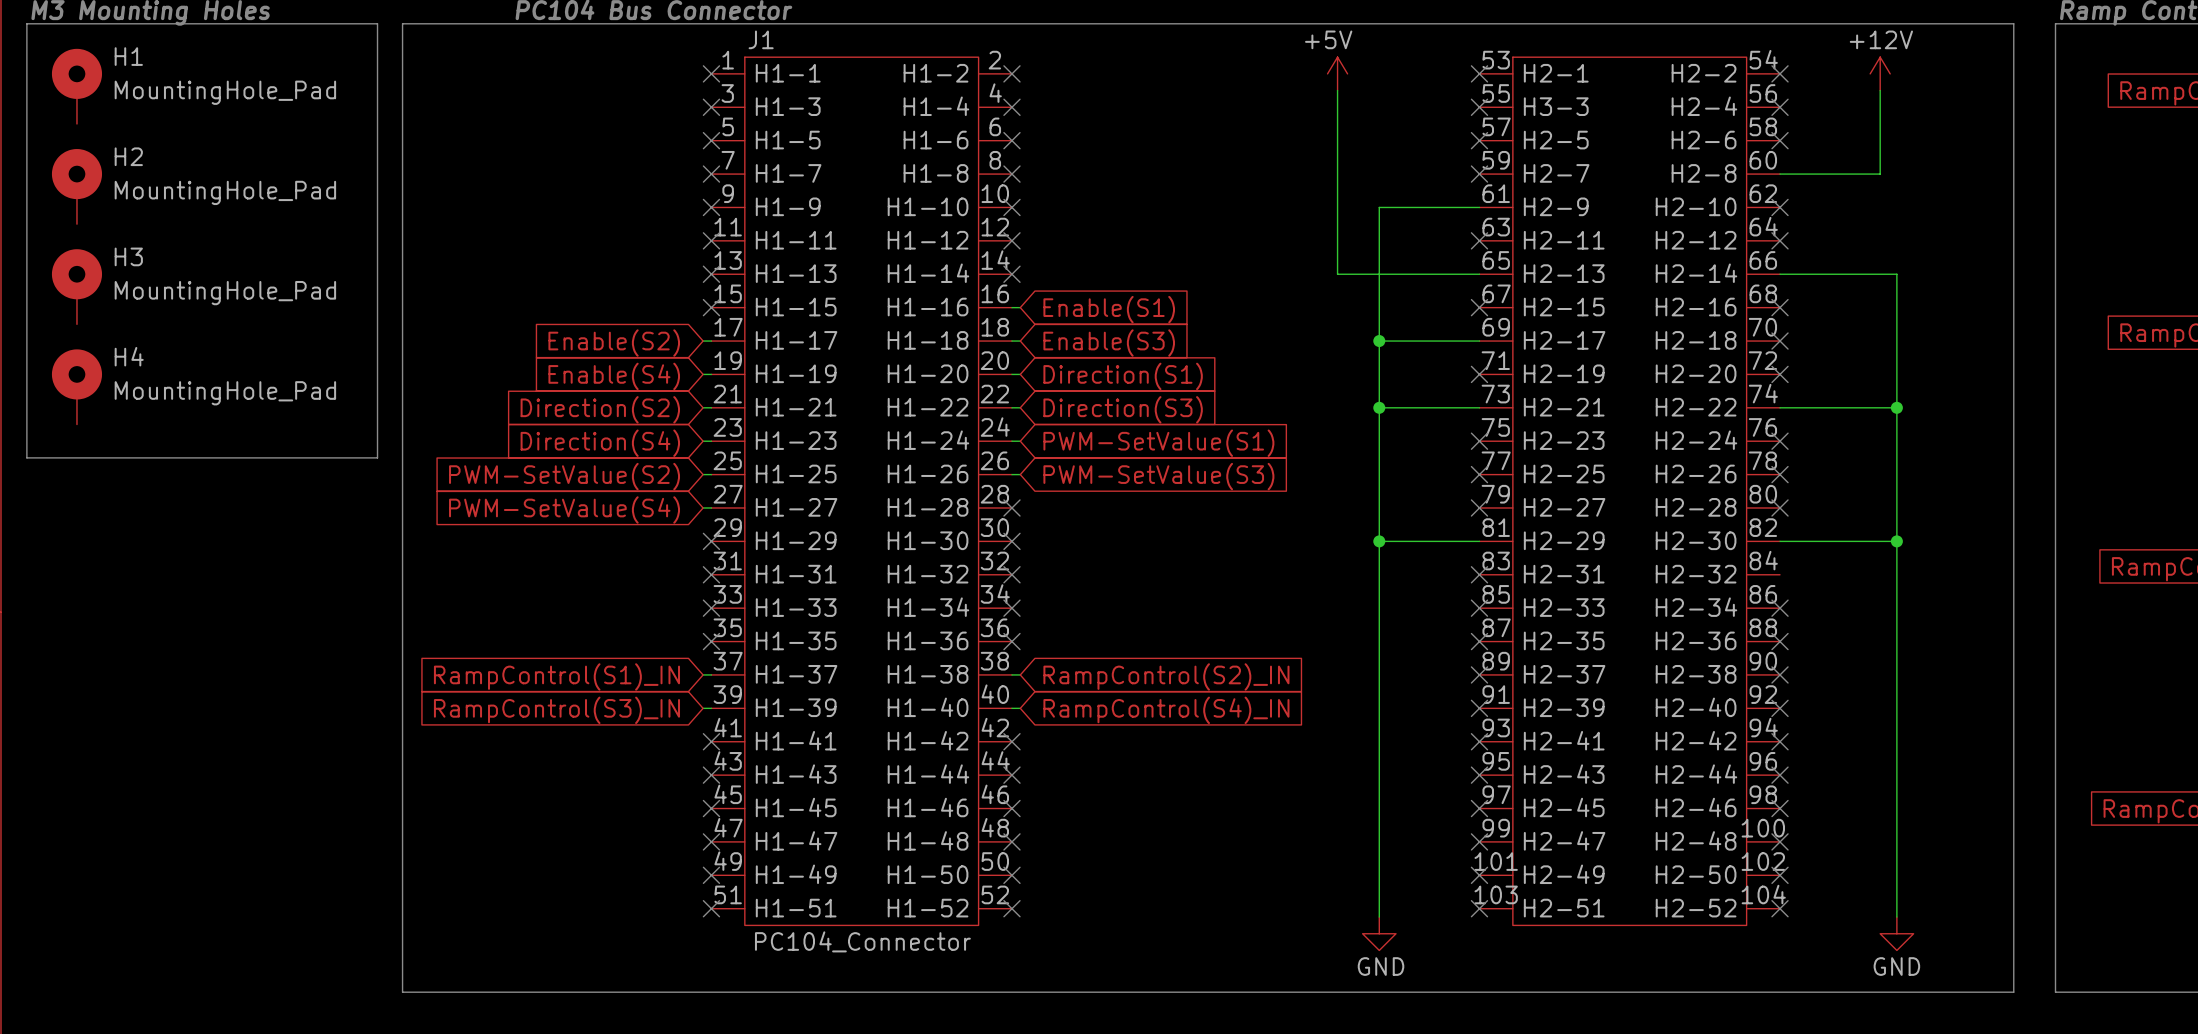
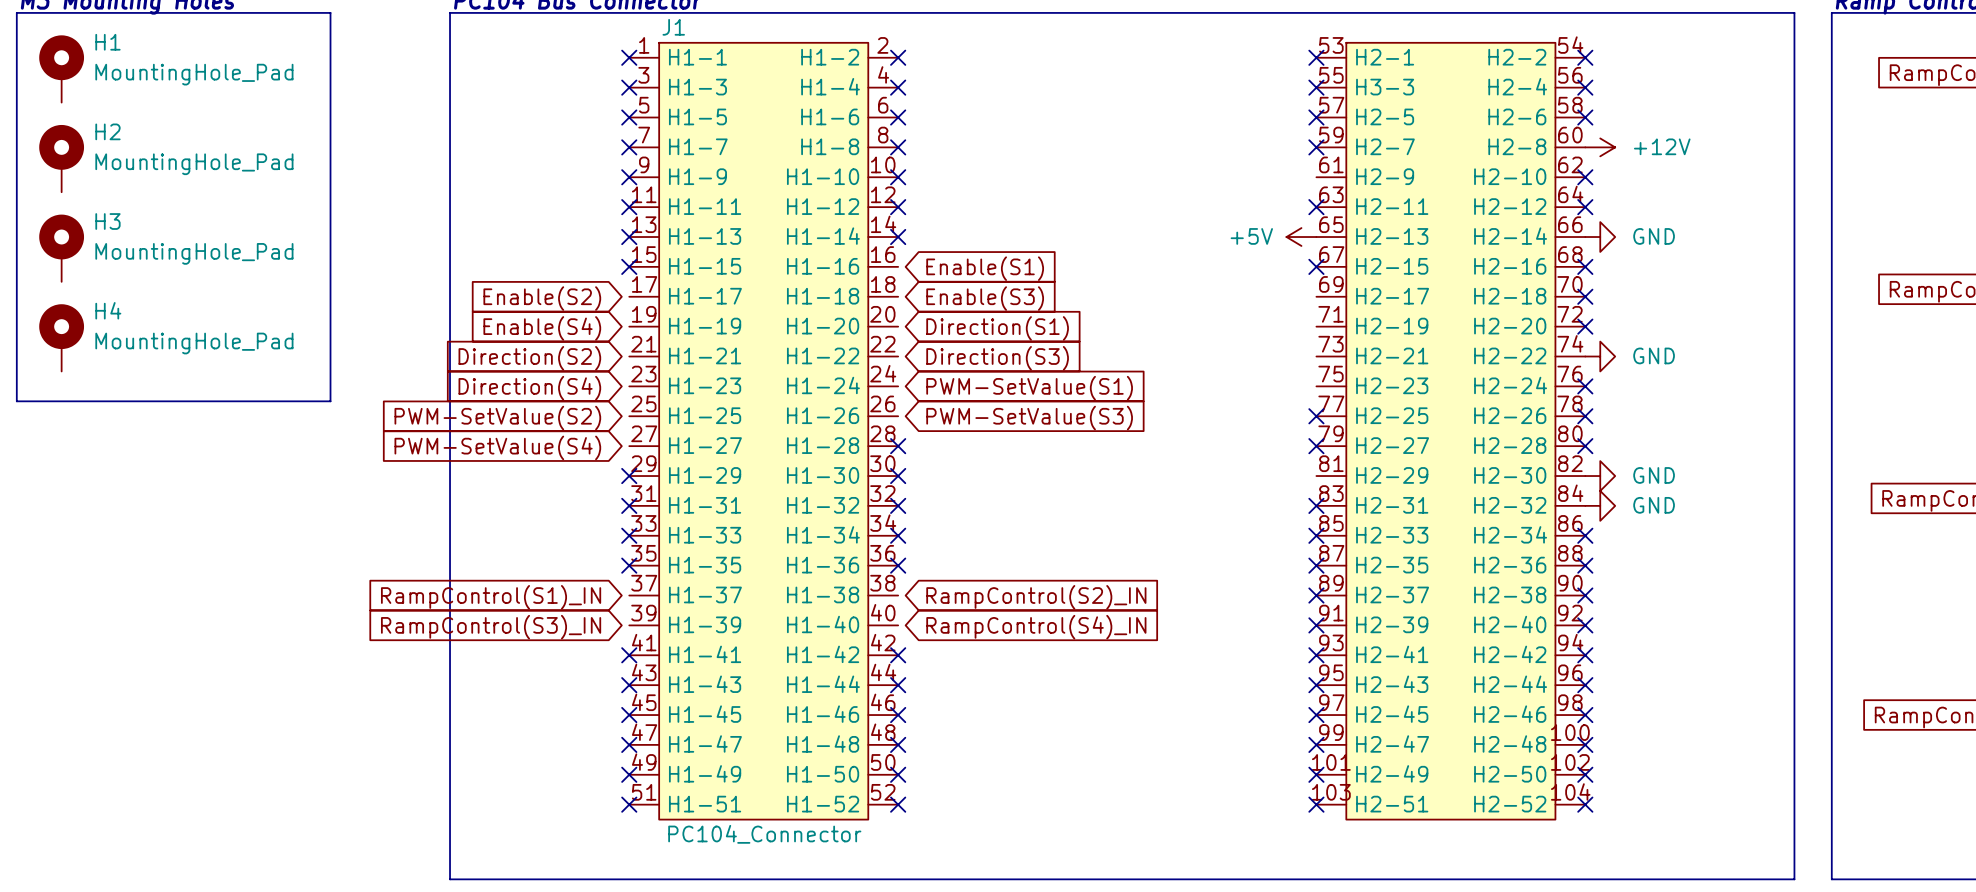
line: (511, 23) (402, 23) (402, 992) (511, 992) -> (450, 12) (450, 879)
power symbol text position: +12V (1881, 39) -> +12V (1662, 146)
power symbol rotation: 0° (1337, 73) -> 90° counterclockwise (1301, 237)
power symbol position: +5V (1337, 73) -> +5V (1301, 237)
power symbol rotation: 0° (1880, 73) -> 90° clockwise (1600, 147)
power symbol position: +12V (1880, 73) -> +12V (1600, 147)
wire: (1337, 90) (1337, 274) (1479, 274) -> none
wire: (1880, 90) (1880, 174) (1780, 174) -> none
wire: (1479, 207) (1379, 207) (1379, 917) -> none
wire: (1780, 274) (1896, 274) (1896, 917) -> none
power symbol: none -> GND (1600, 237)
wire: (1011, 307) (1020, 307) -> none
wire: (703, 341) (711, 341) -> none
wire: (1011, 341) (1020, 341) -> none
wire: (1379, 341) (1479, 341) -> none
junction: (1379, 341) -> none
wire: (703, 374) (711, 374) -> none
wire: (1011, 374) (1020, 374) -> none
no-connect mark: (1479, 374) -> none
wire: (703, 407) (711, 407) -> none
wire: (1011, 407) (1020, 407) -> none
wire: (1379, 407) (1479, 407) -> none
junction: (1379, 407) -> none
wire: (1780, 407) (1896, 407) -> none
power symbol: none -> GND (1600, 356)
junction: (1896, 407) -> none
wire: (703, 441) (711, 441) -> none
wire: (1011, 441) (1020, 441) -> none
no-connect mark: (1479, 441) -> none
wire: (703, 474) (711, 474) -> none
wire: (1011, 474) (1020, 474) -> none
wire: (703, 507) (711, 507) -> none
wire: (1379, 541) (1479, 541) -> none
junction: (1379, 541) -> none
wire: (1780, 541) (1896, 541) -> none
power symbol: none -> GND (1600, 476)
junction: (1896, 541) -> none
power symbol: none -> GND (1600, 505)
wire: (703, 674) (711, 674) -> none
wire: (1011, 674) (1020, 674) -> none
wire: (703, 708) (711, 708) -> none
wire: (1011, 708) (1020, 708) -> none
power symbol: GND (1379, 933) -> none
power symbol: GND (1896, 933) -> none

